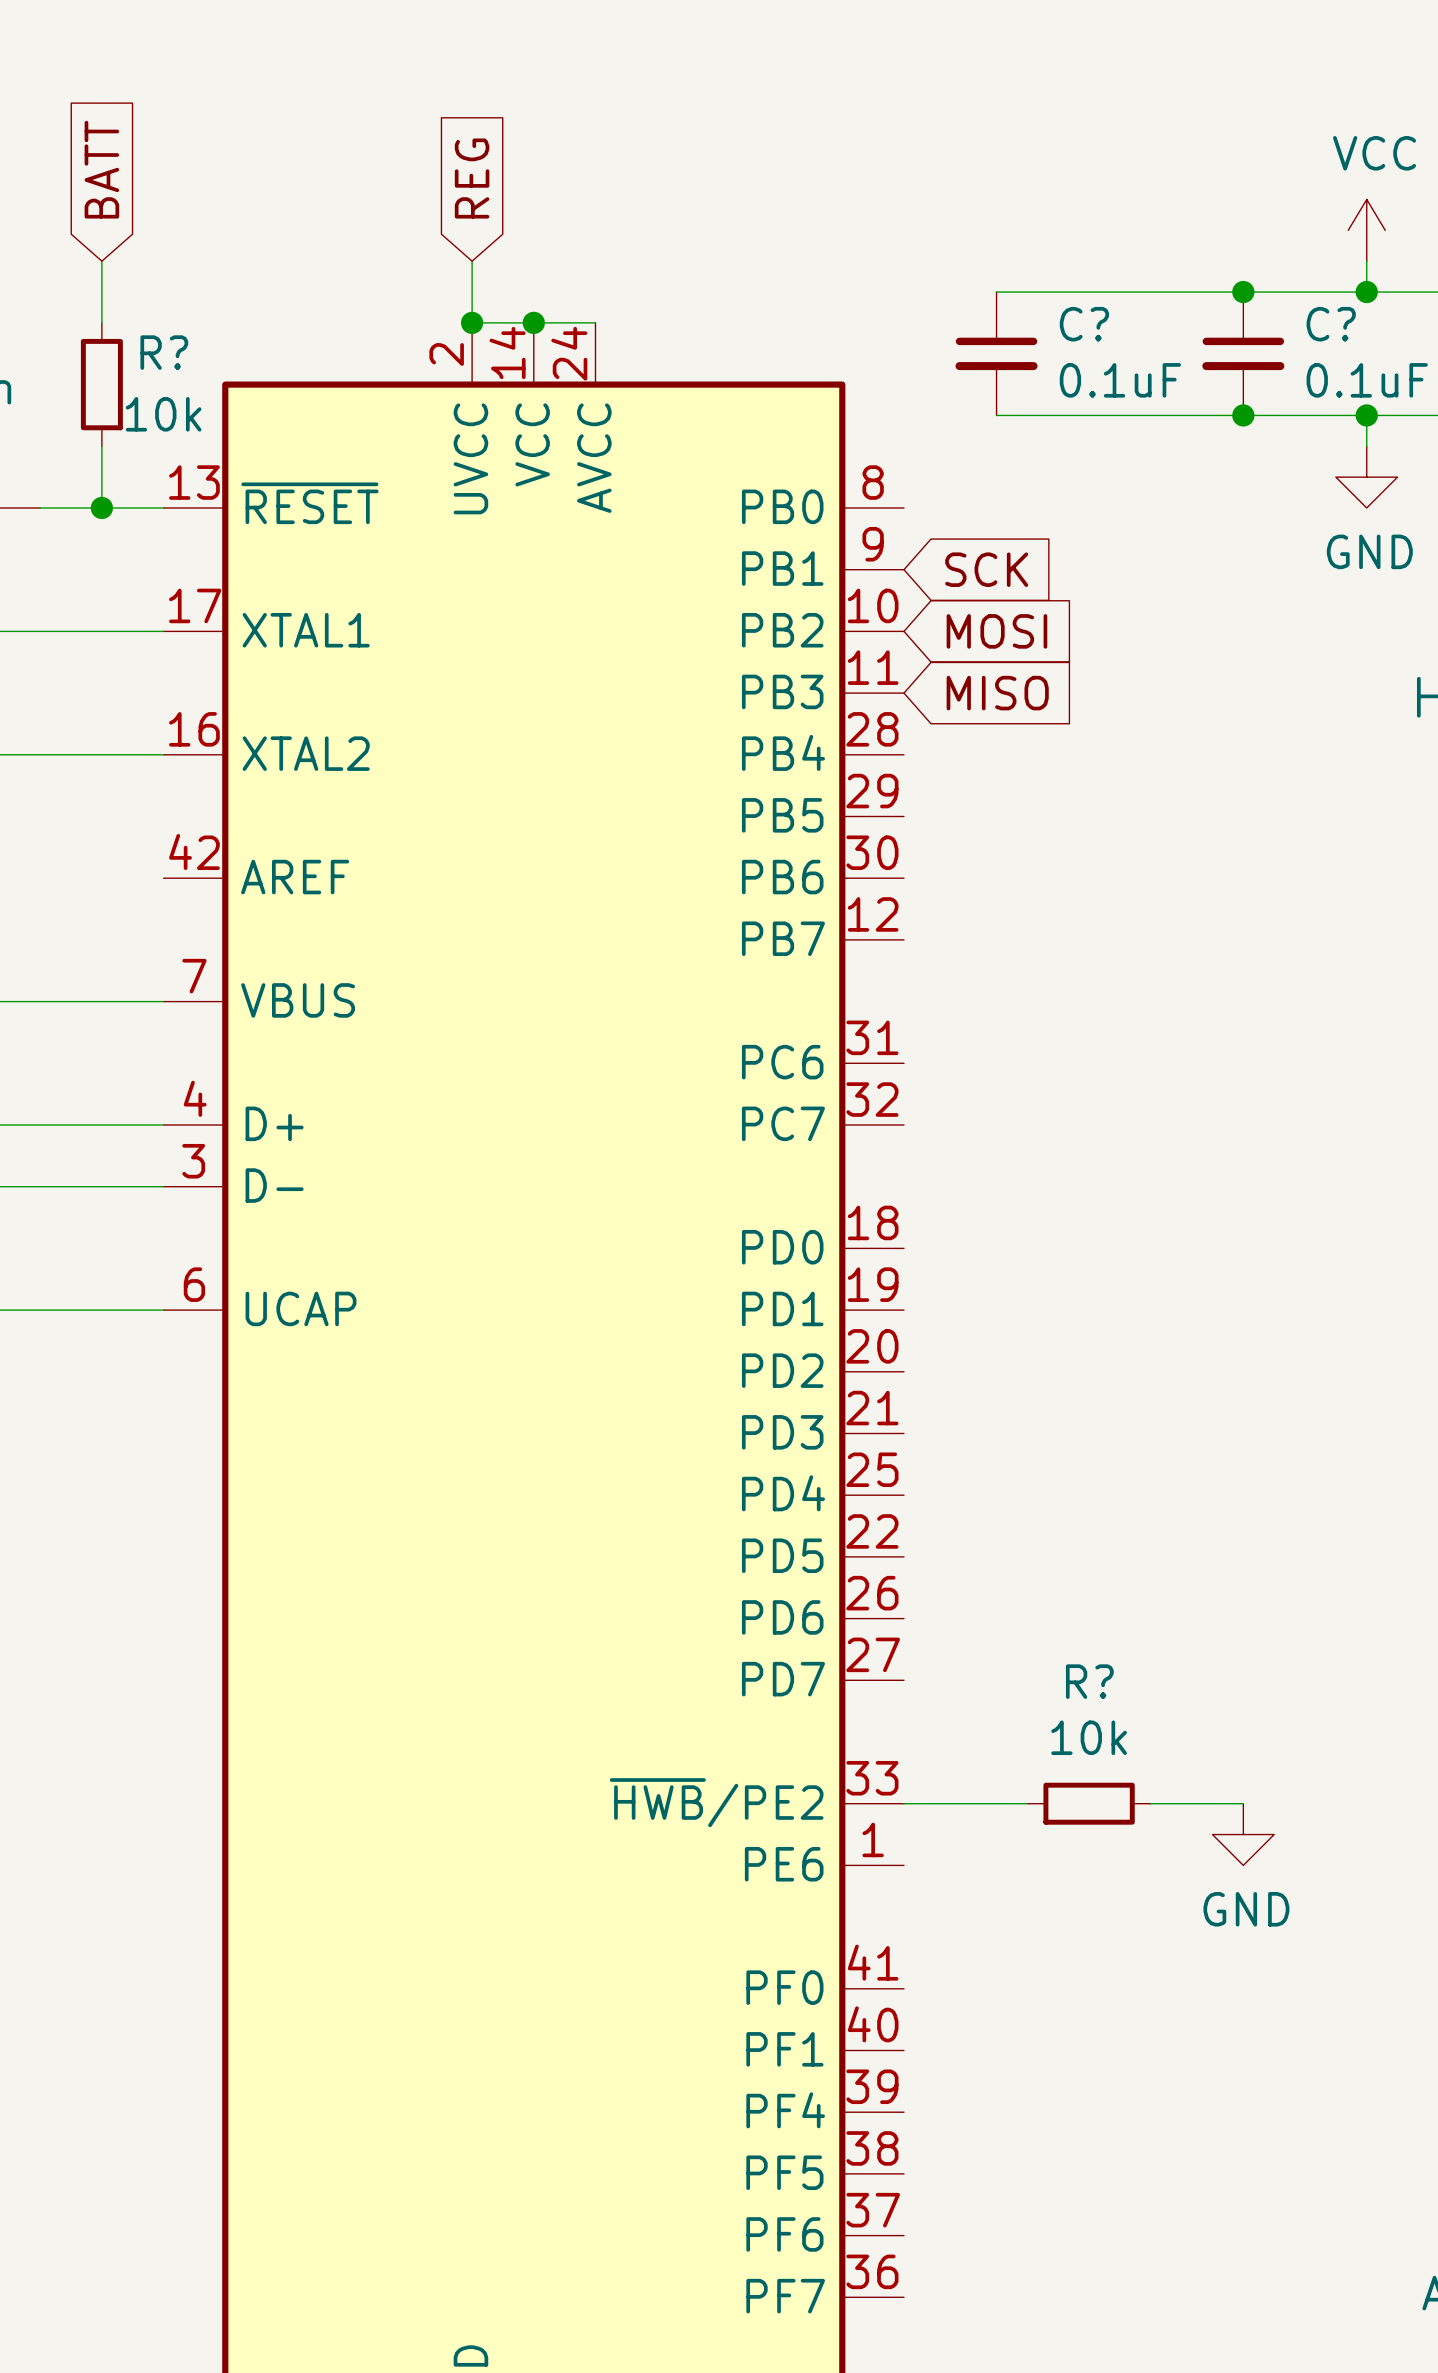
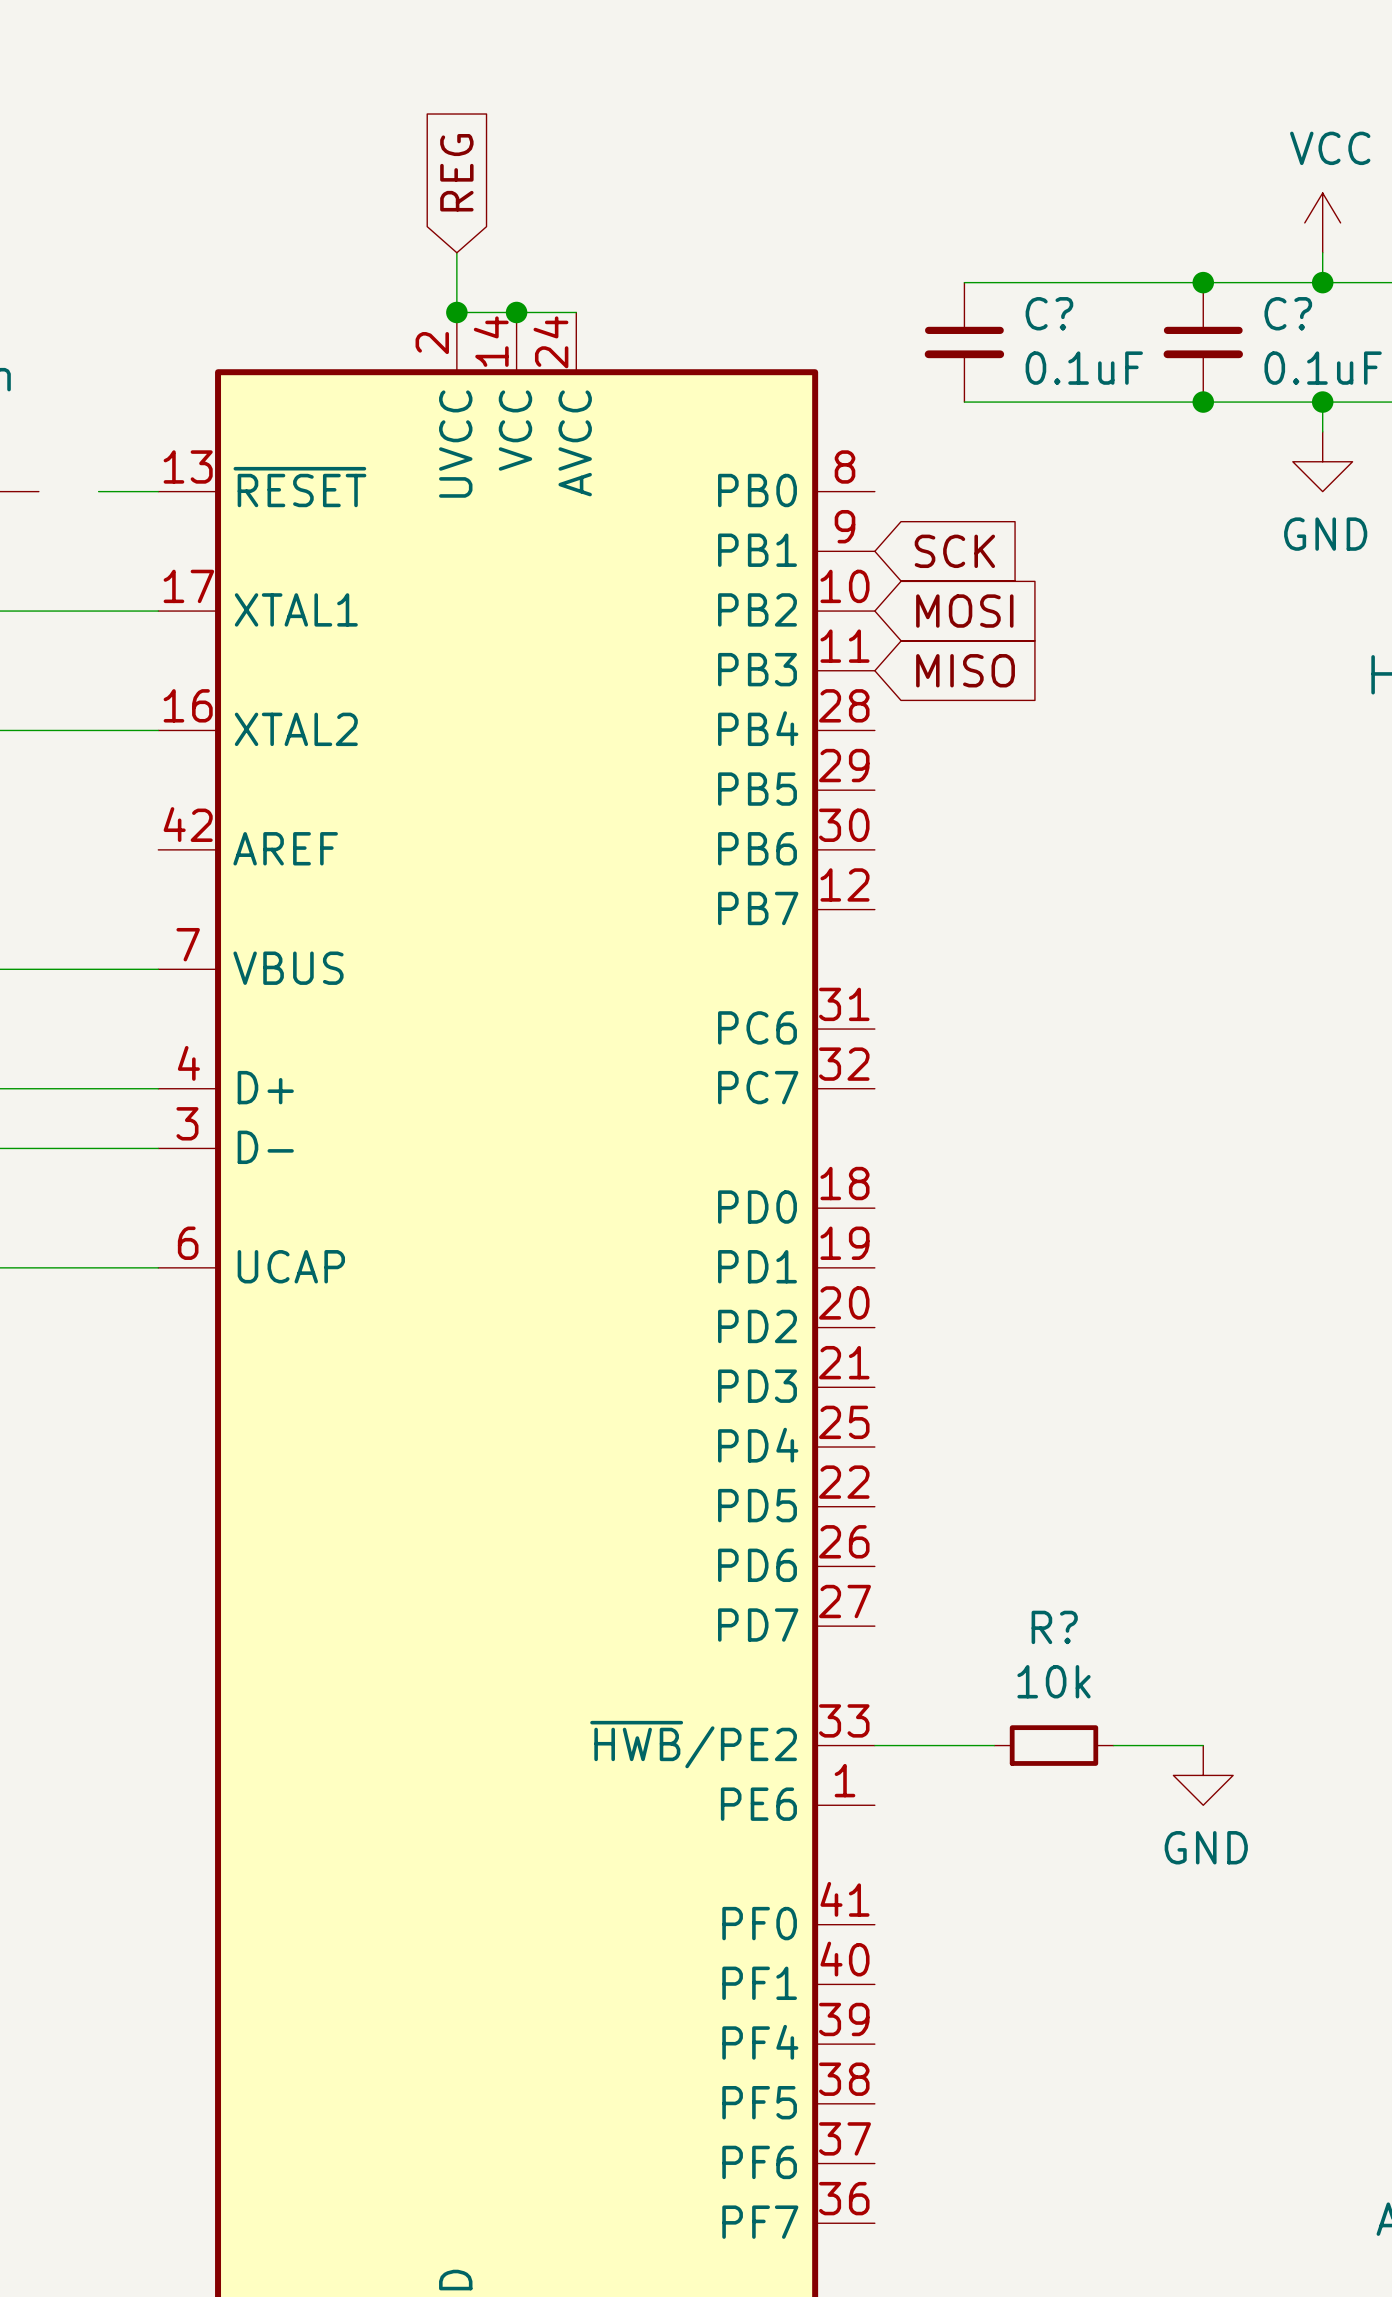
global label: BATT (101, 169) -> none
wire: (101, 261) (101, 322) -> none
R?: 10k (101, 384) -> none
wire: (101, 446) (101, 507) (40, 507) -> none
junction: (101, 507) -> none

